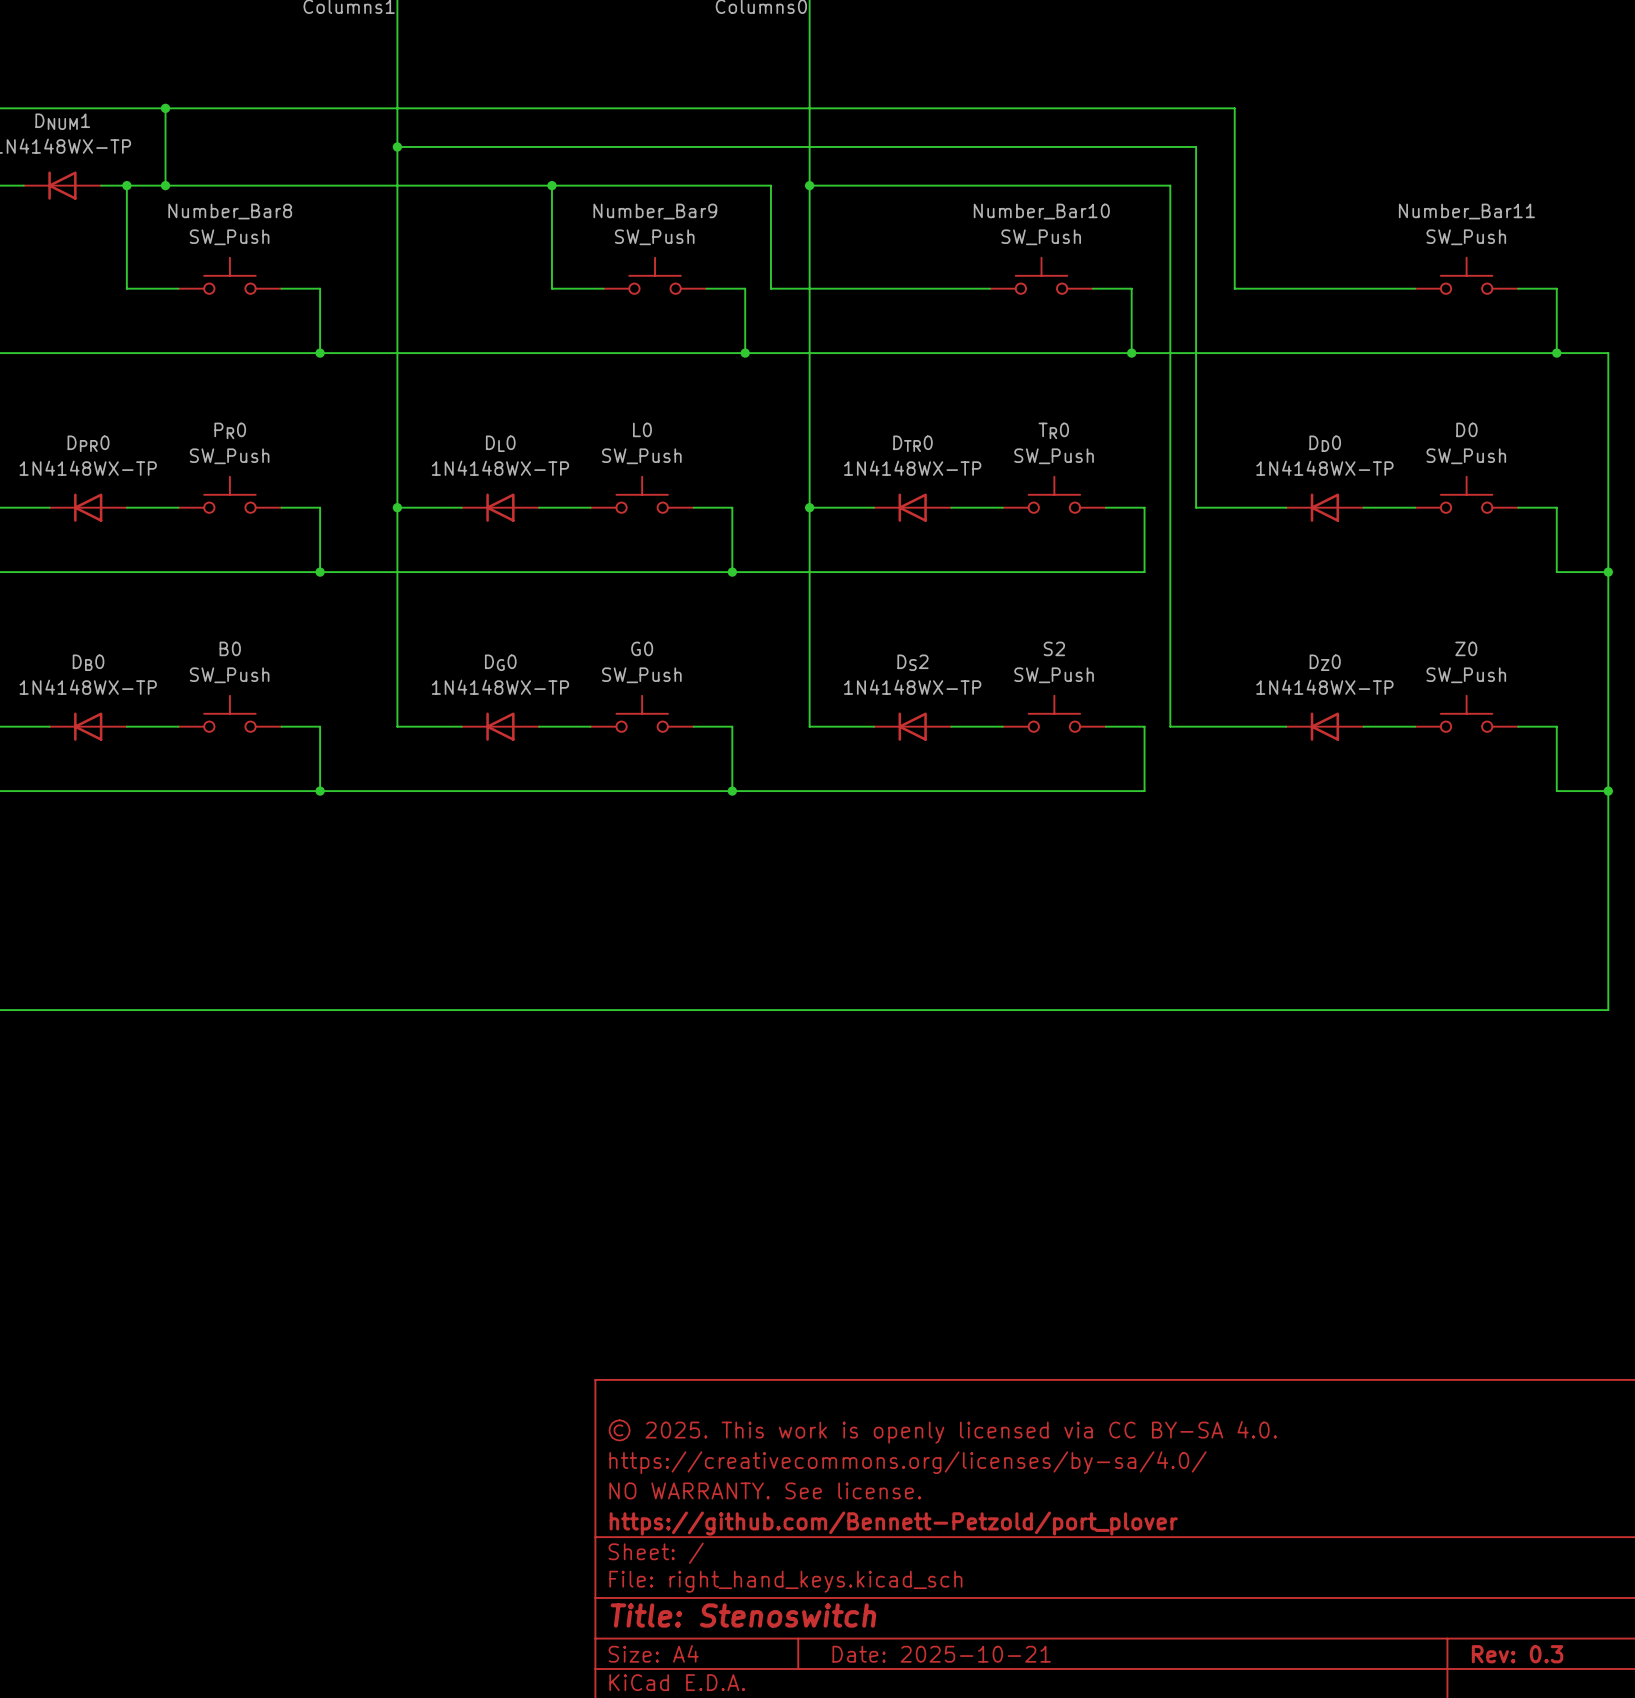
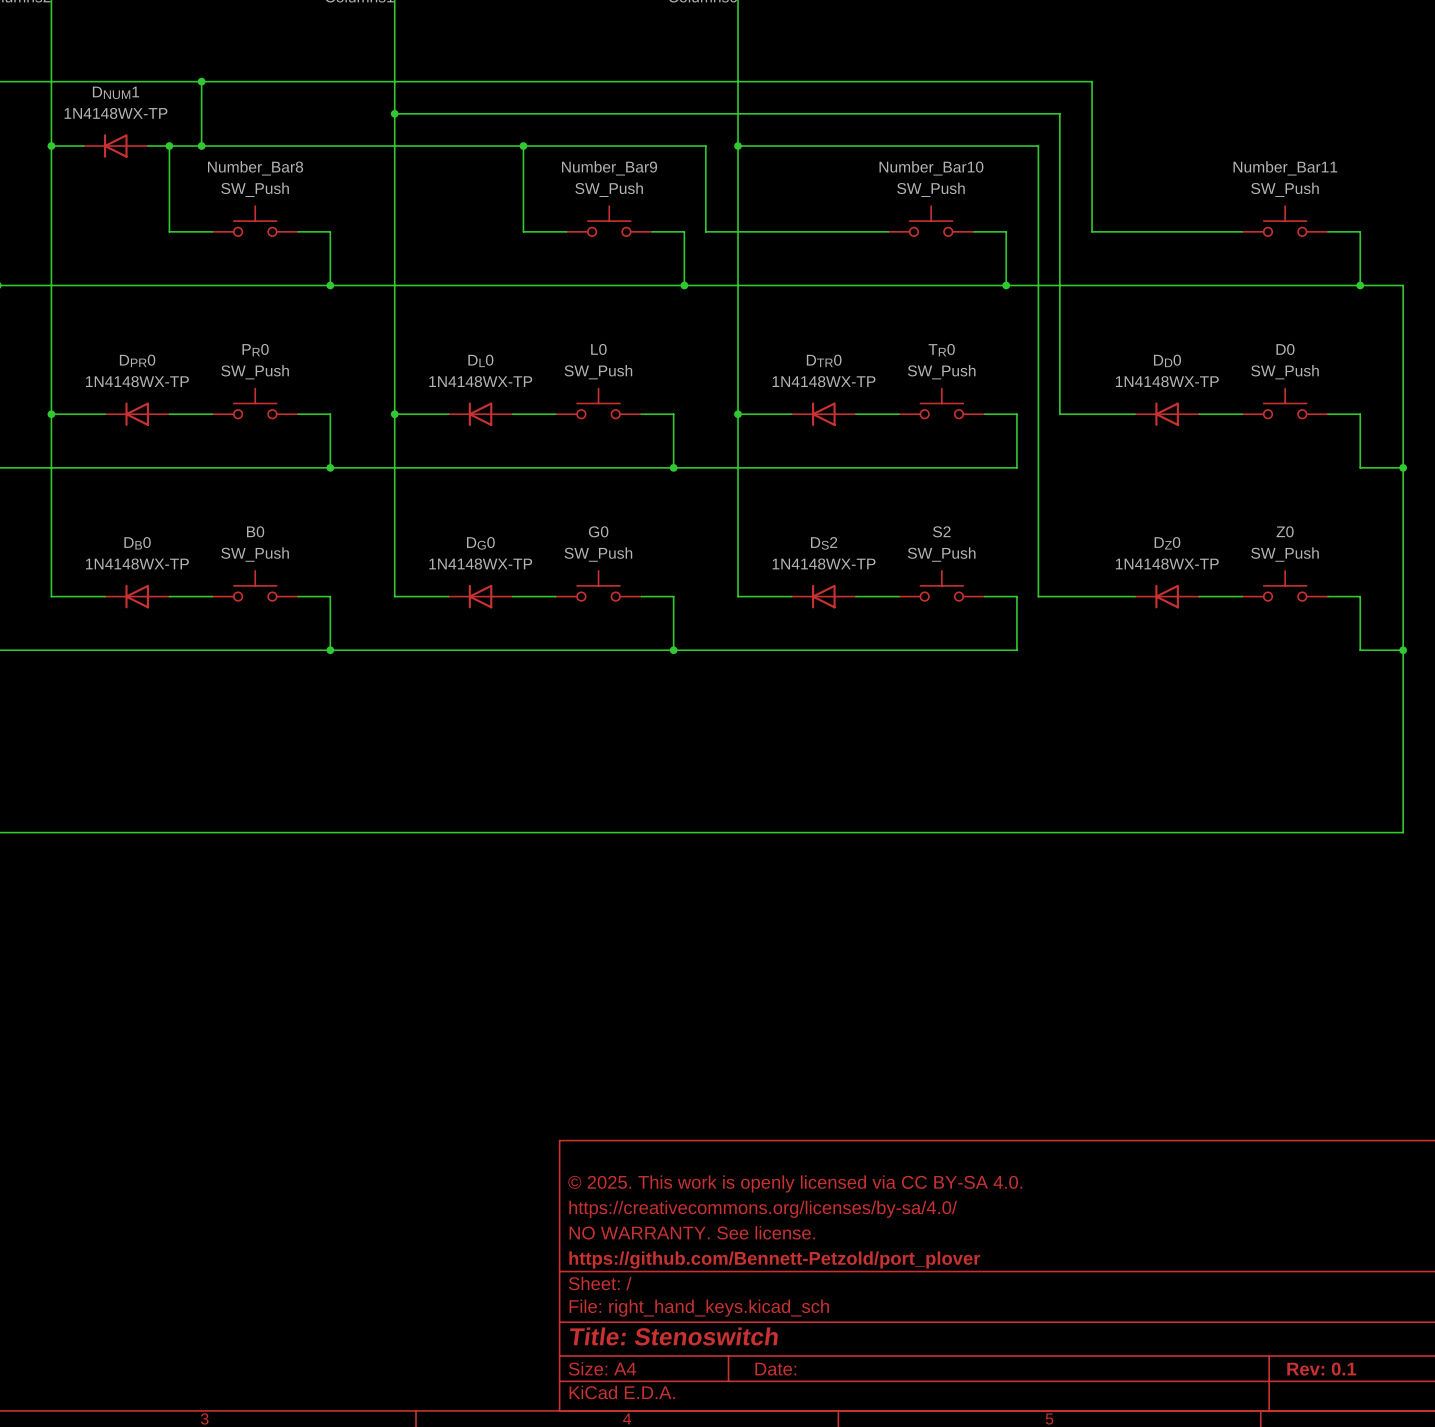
title block: Date: 2025-10-21 (941, 1654) -> Date: (775, 1369)
title block: Rev: 0.3 (1517, 1654) -> Rev: 0.1 (1321, 1369)

